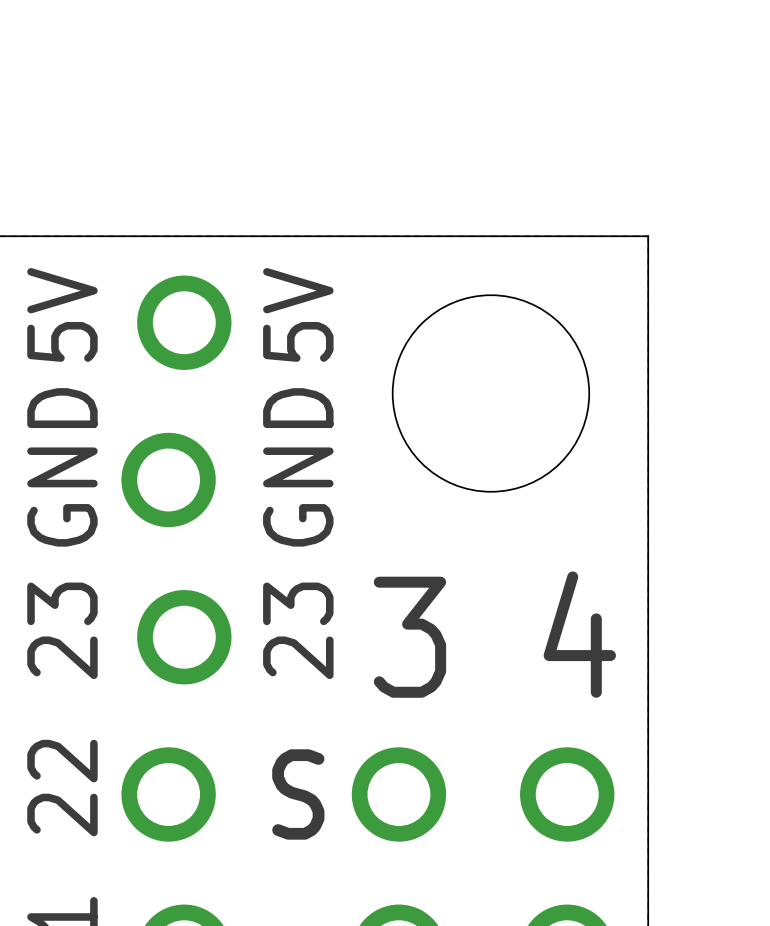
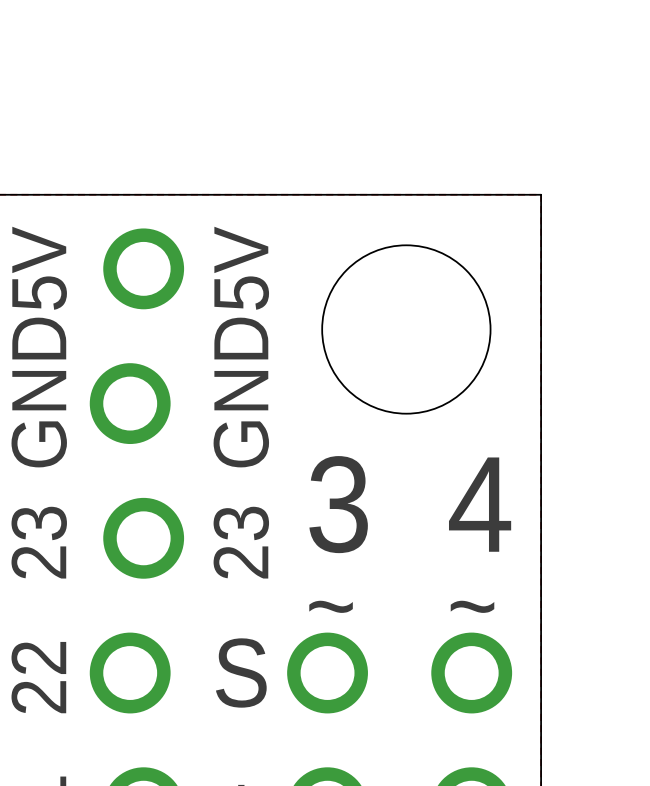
text position: 4 (579, 634) -> 4 (480, 504)
text position: 3 (409, 637) -> 3 (338, 504)
text: none -> ~ (331, 606)
text: none -> ~ (472, 606)

